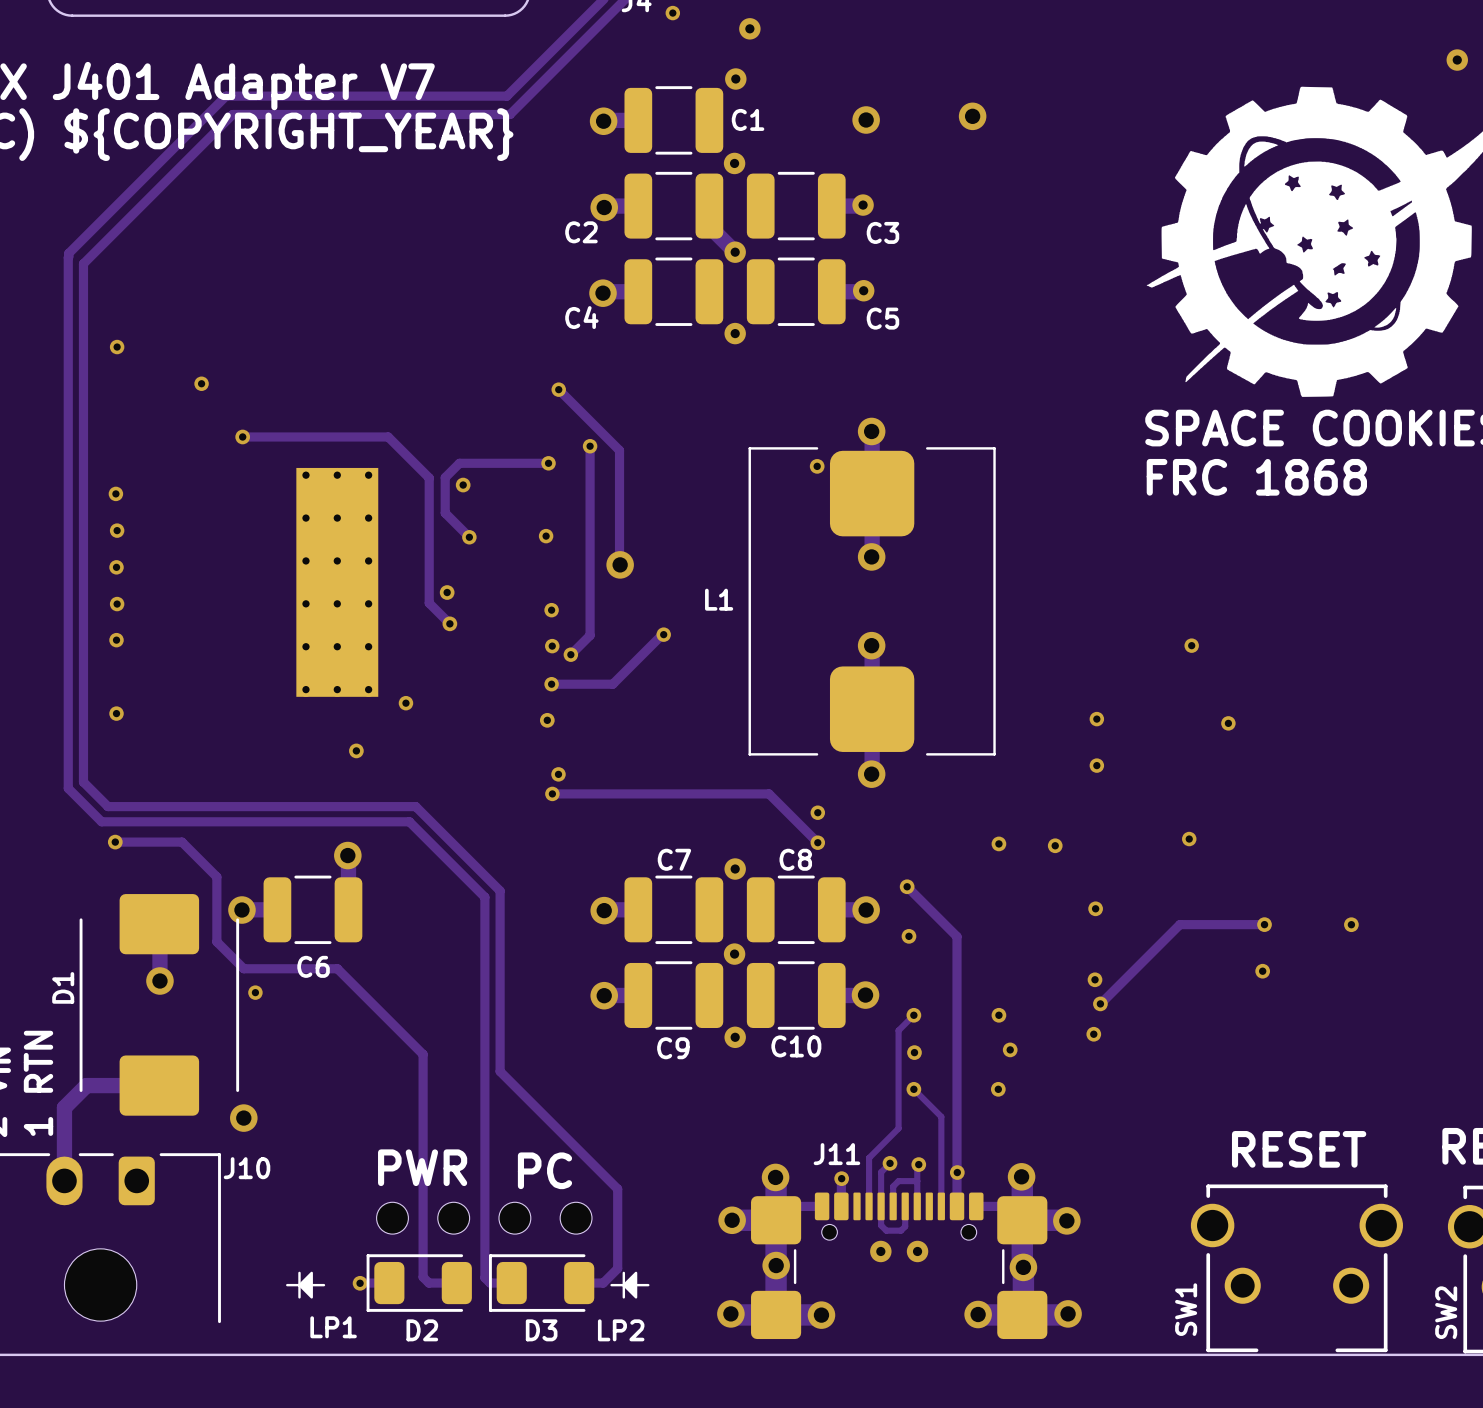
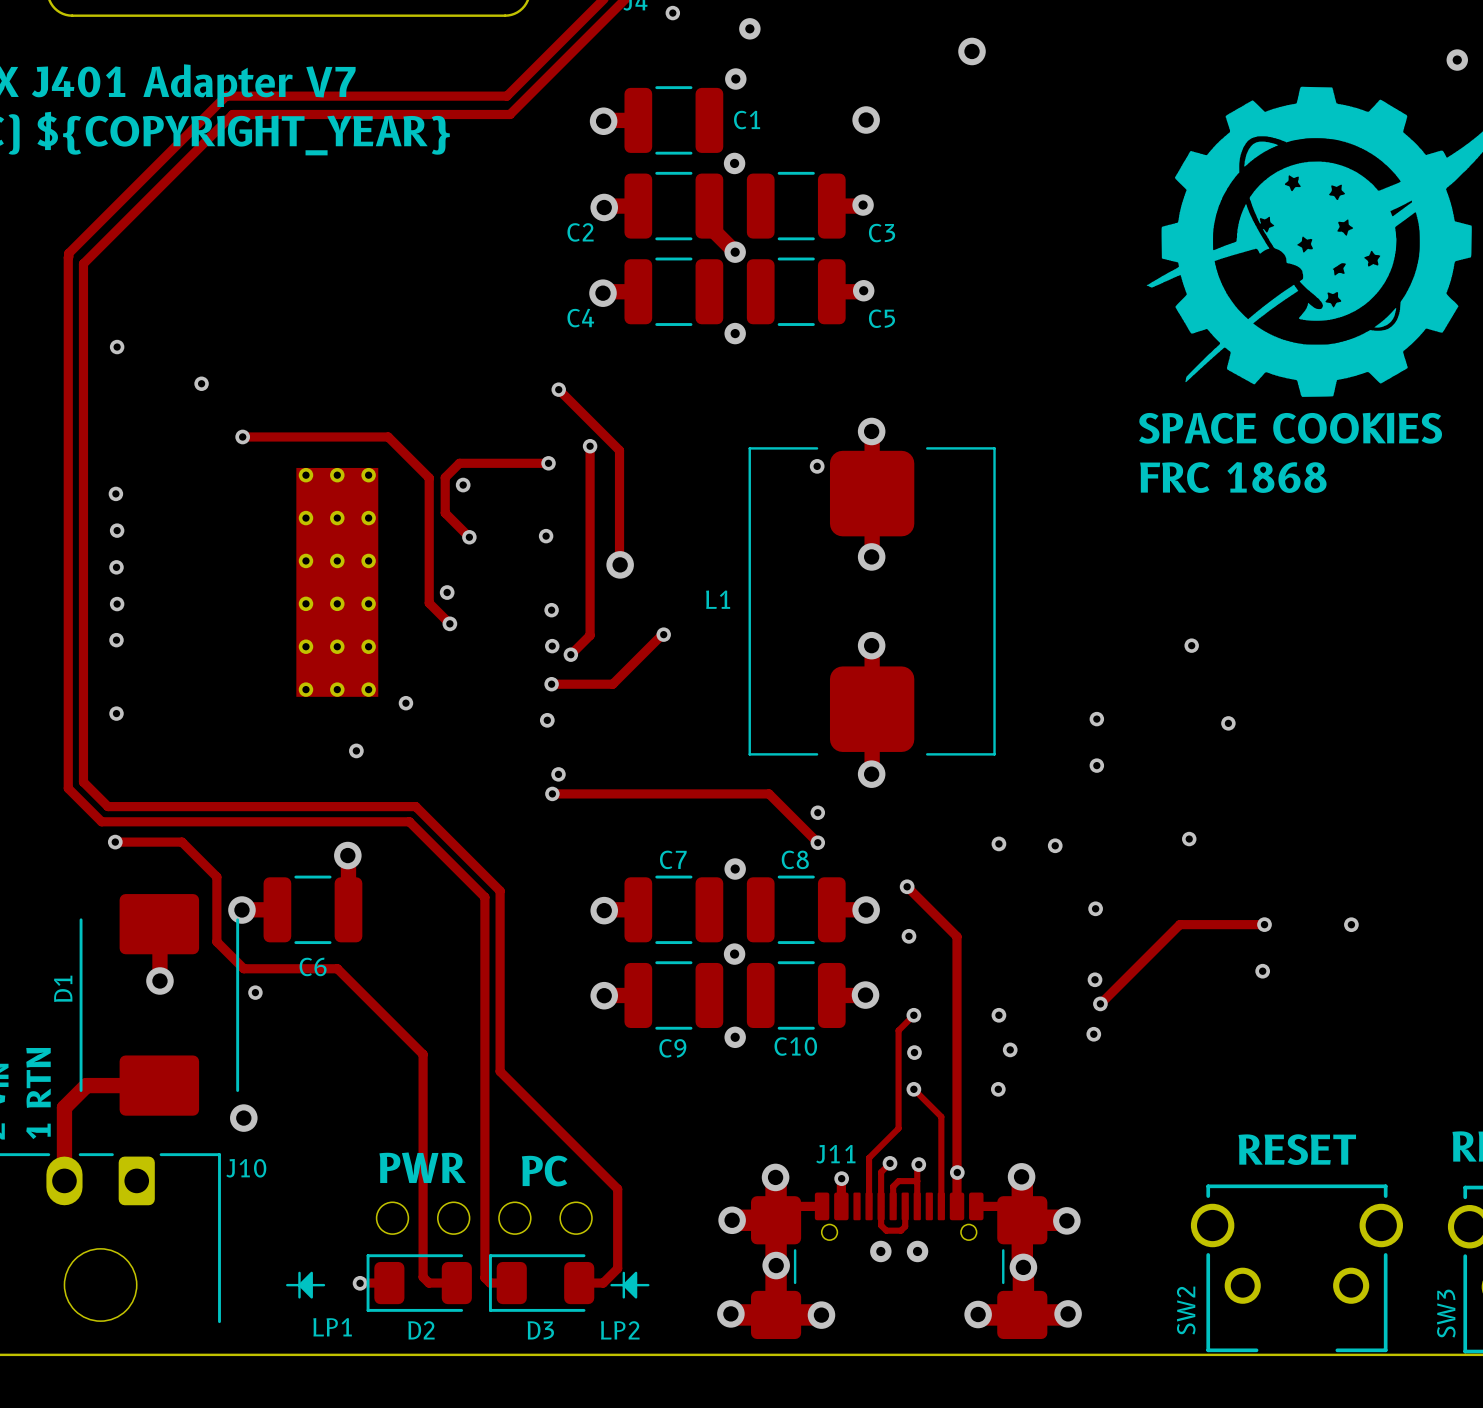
via position: (972, 116) -> (972, 51)
SW1 name: SW1 (1186, 1309) -> SW2 (1186, 1310)
SW2 name: SW2 (1446, 1312) -> SW3 (1446, 1313)

